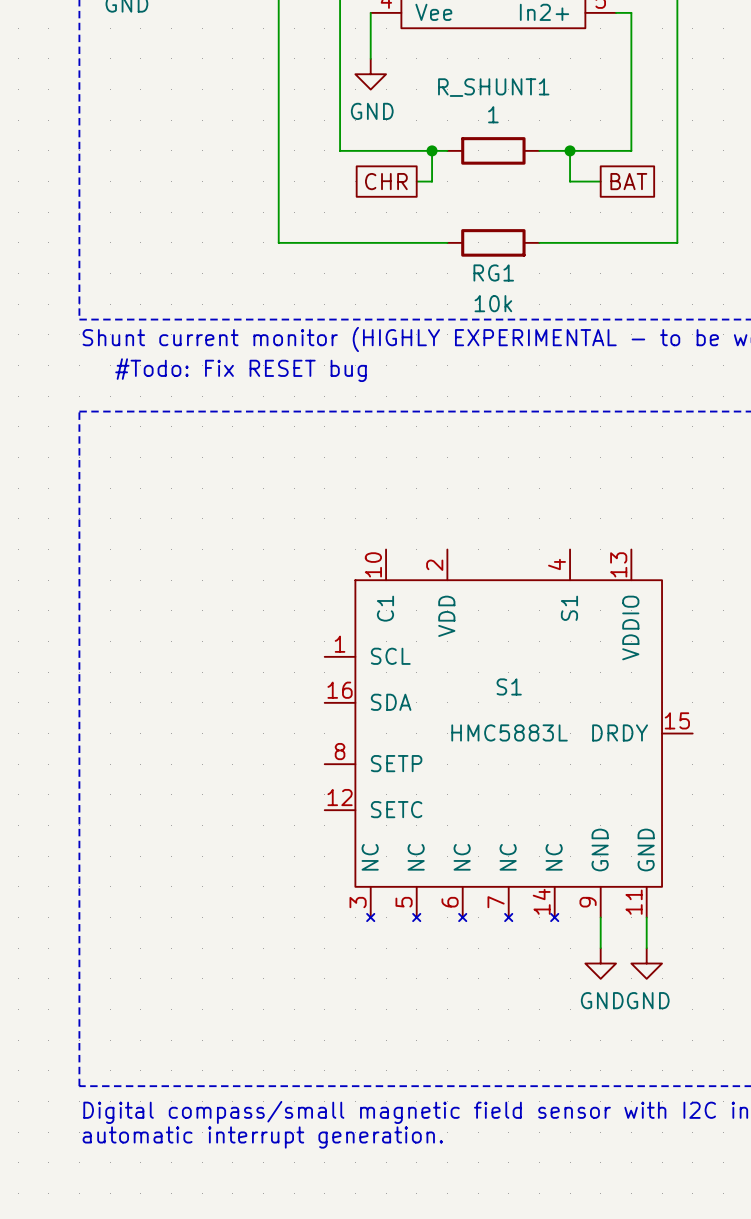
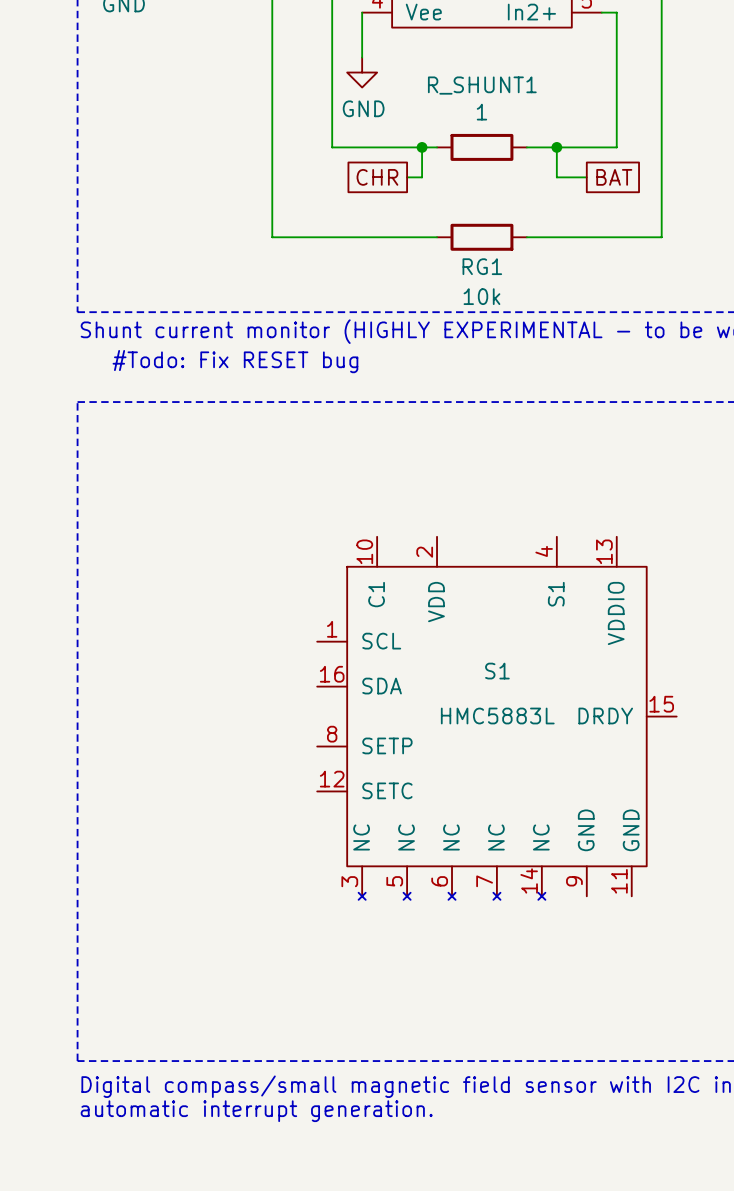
wire: (600, 917) (600, 948) -> none
wire: (646, 917) (646, 948) -> none
power symbol: GND (600, 963) -> none
power symbol: GND (646, 963) -> none

